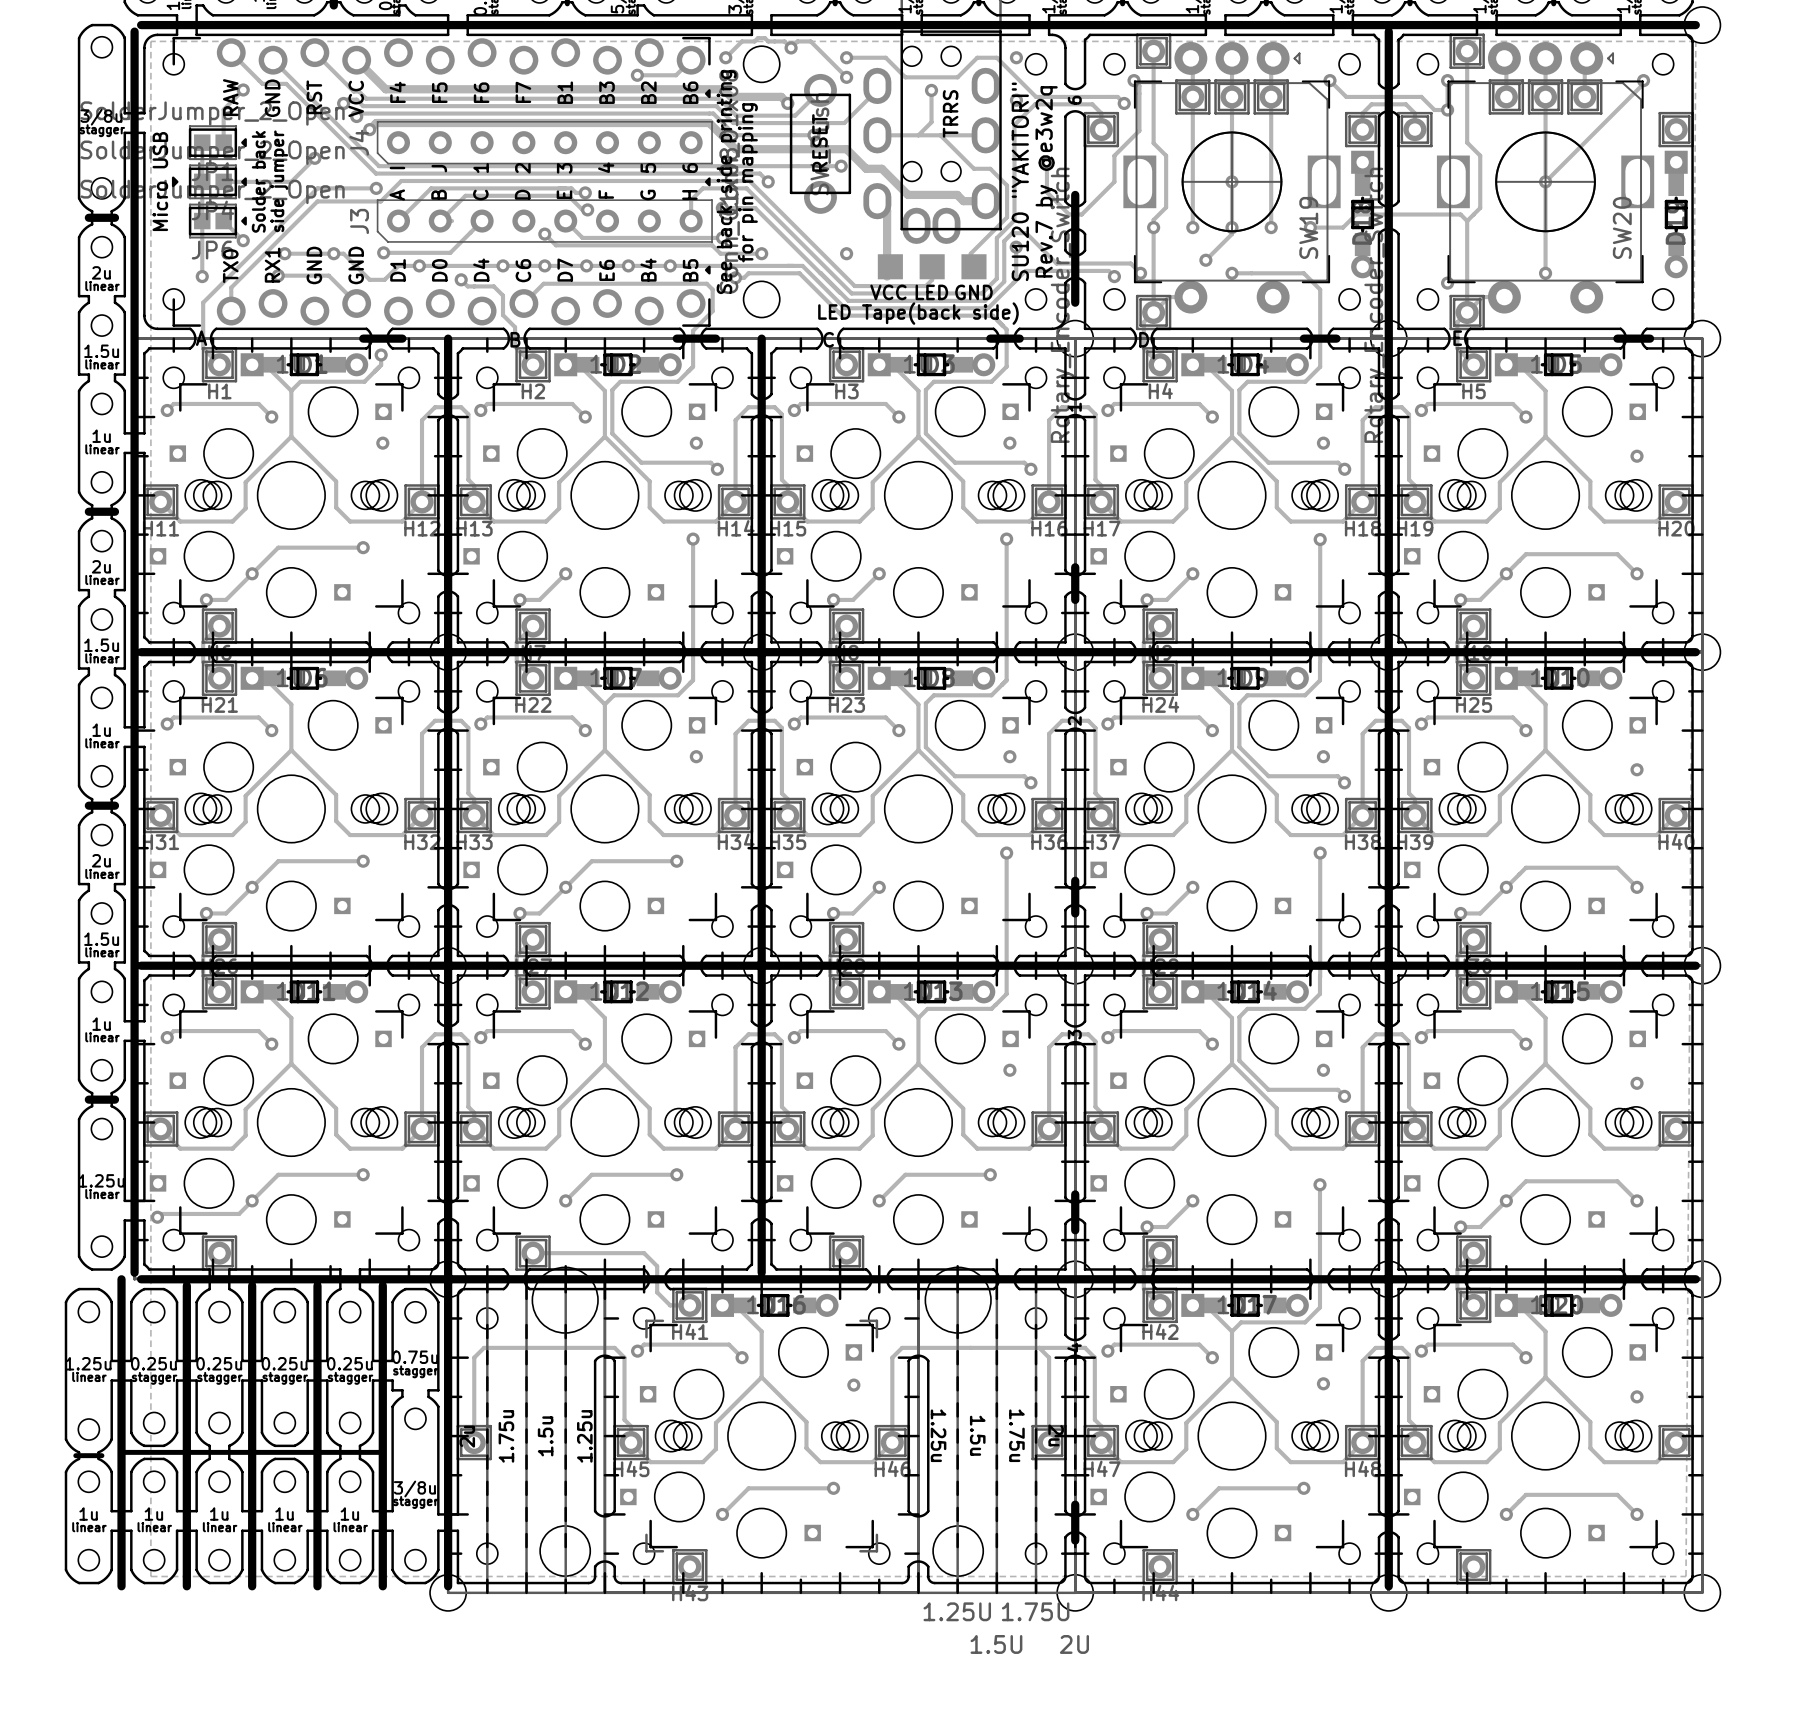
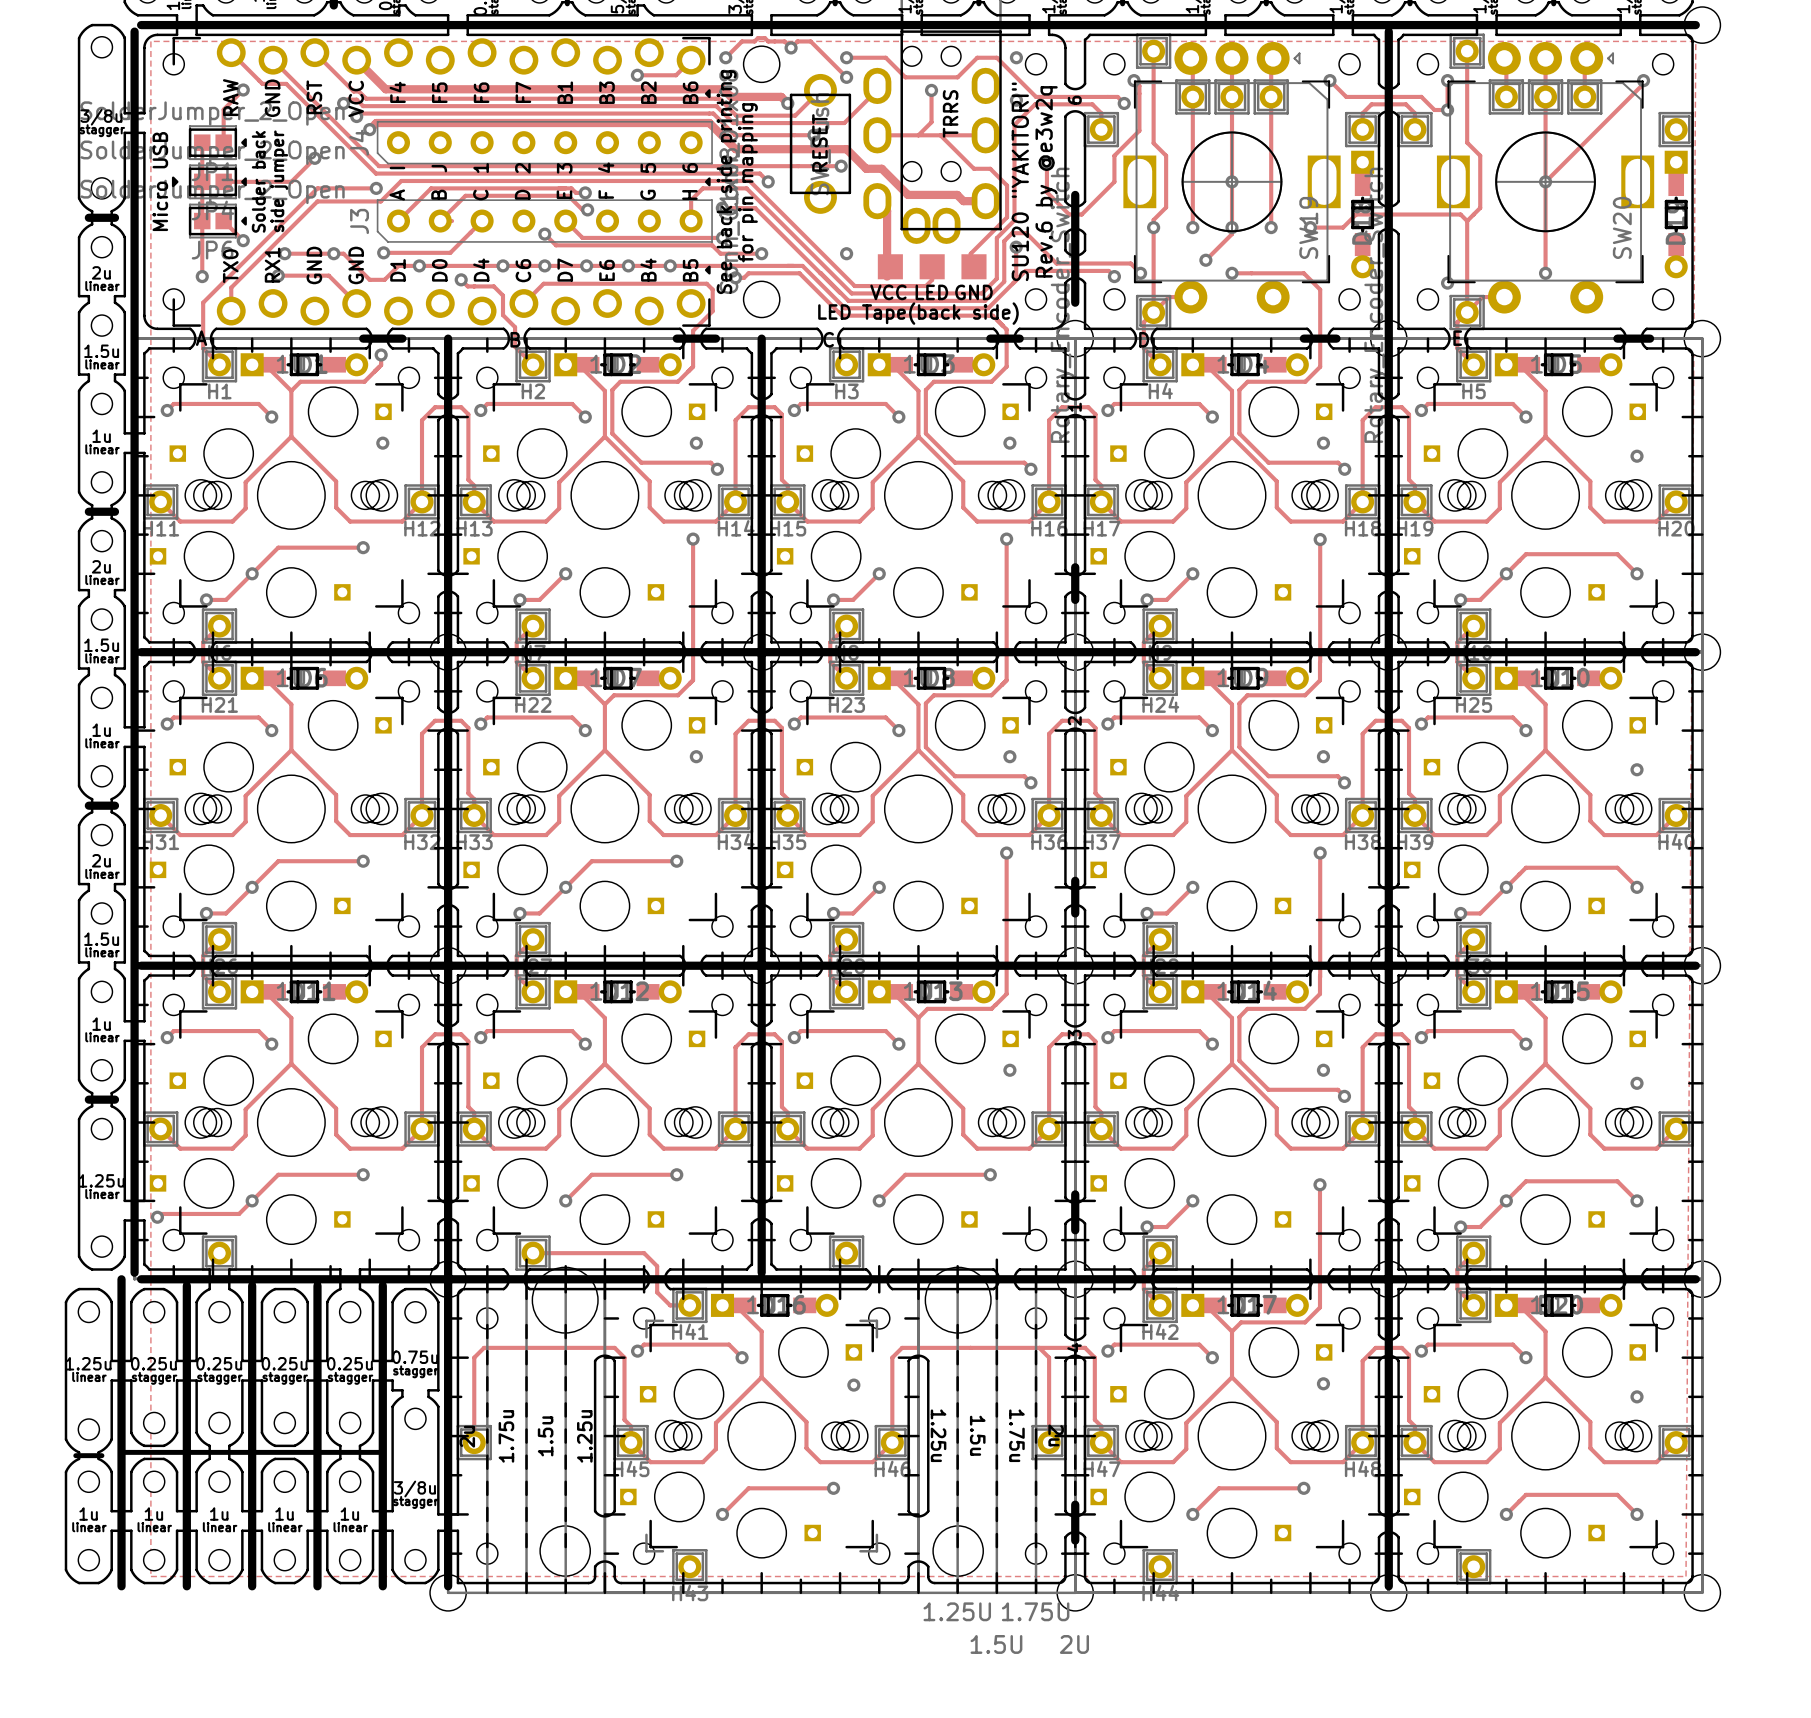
text: Rev.7 by @e3w2q (1046, 181) -> Rev.6 by @e3w2q (1046, 181)

